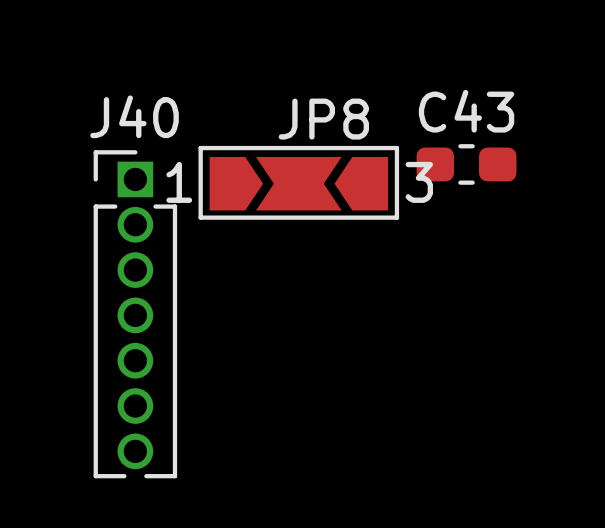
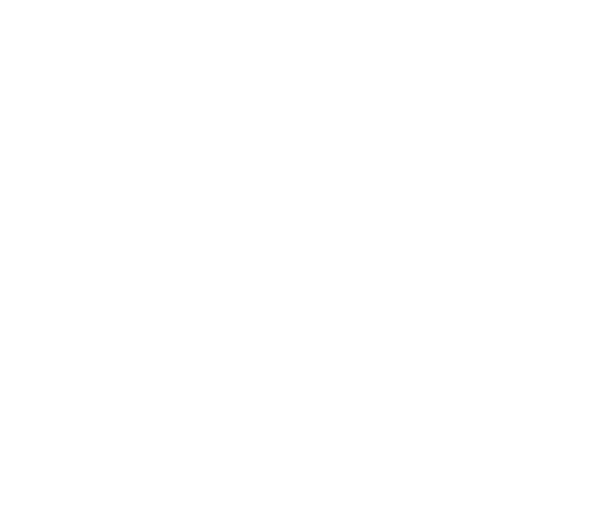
C43: (466, 164) -> none
JP8: (298, 182) -> none
J40: (135, 314) -> none

